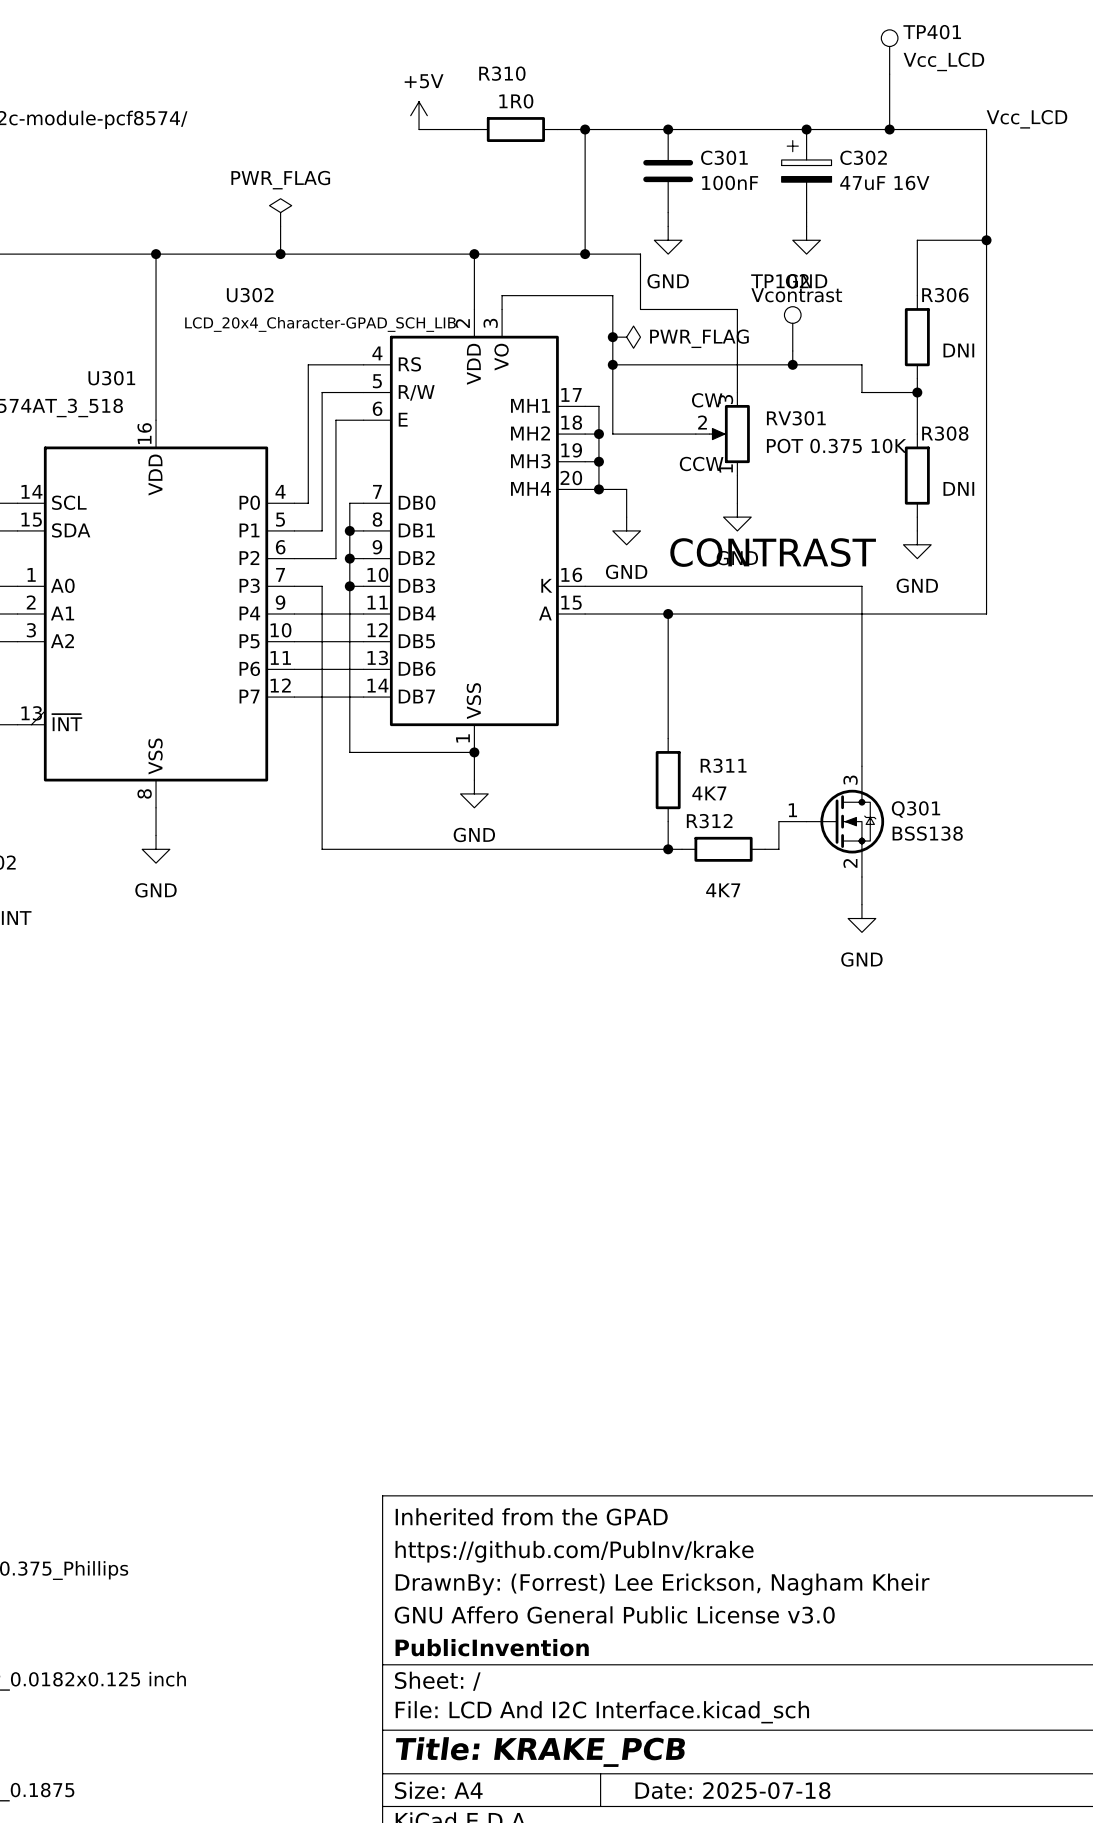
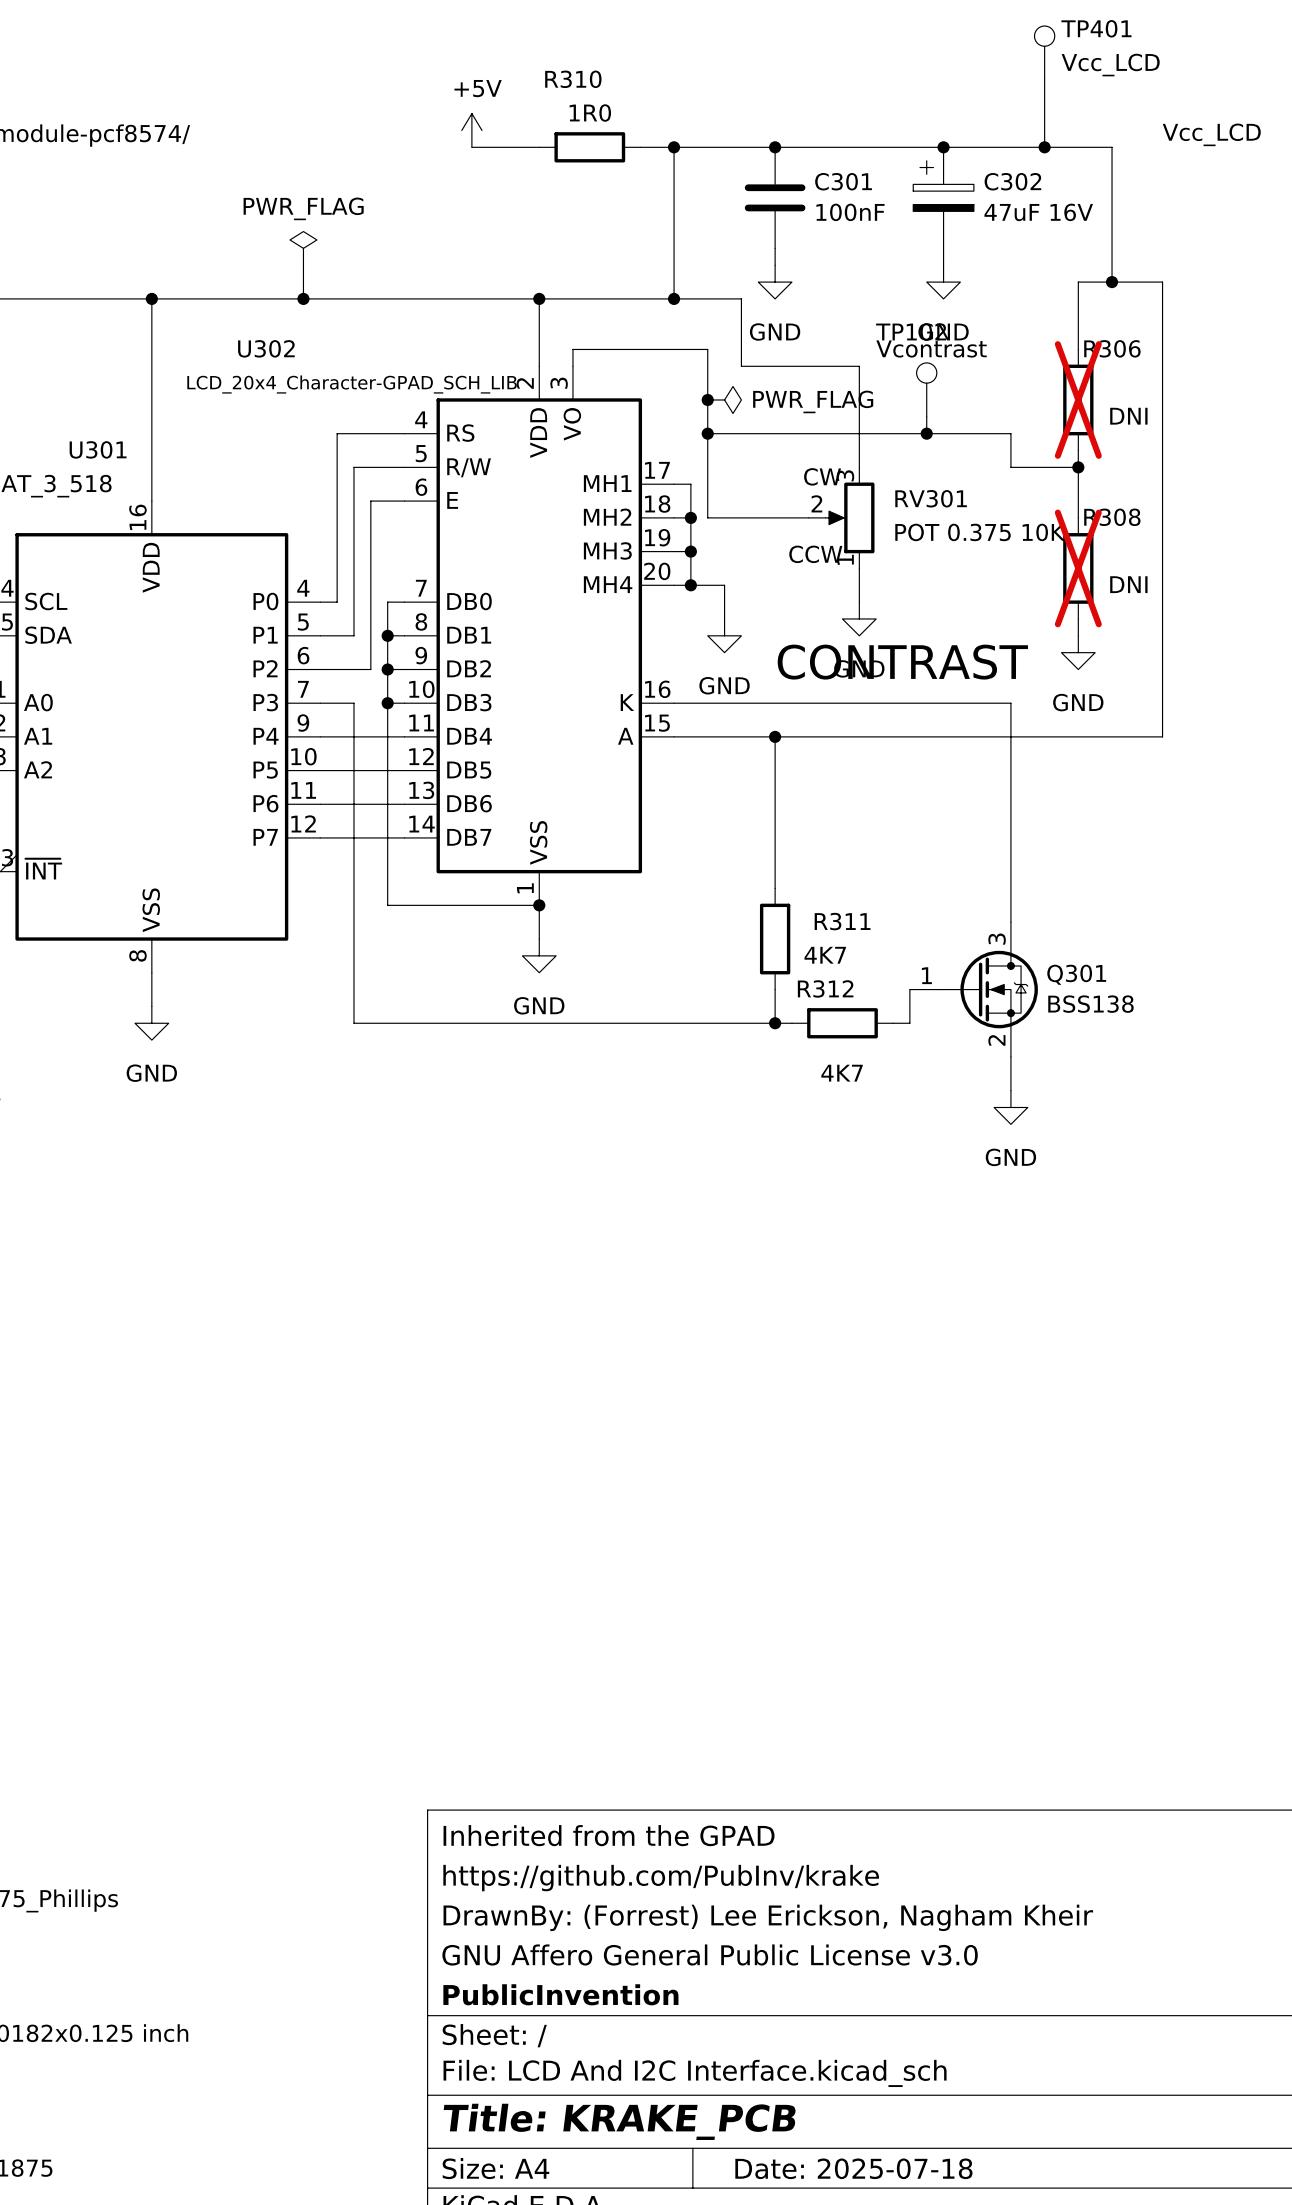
wire: (945, 129) (986, 129) (986, 240) -> (1112, 147) (1112, 282)
junction position: (986, 240) -> (1112, 282)
R306 do-not-place cross: none -> (1078, 399)
R308 do-not-place cross: none -> (1078, 568)

